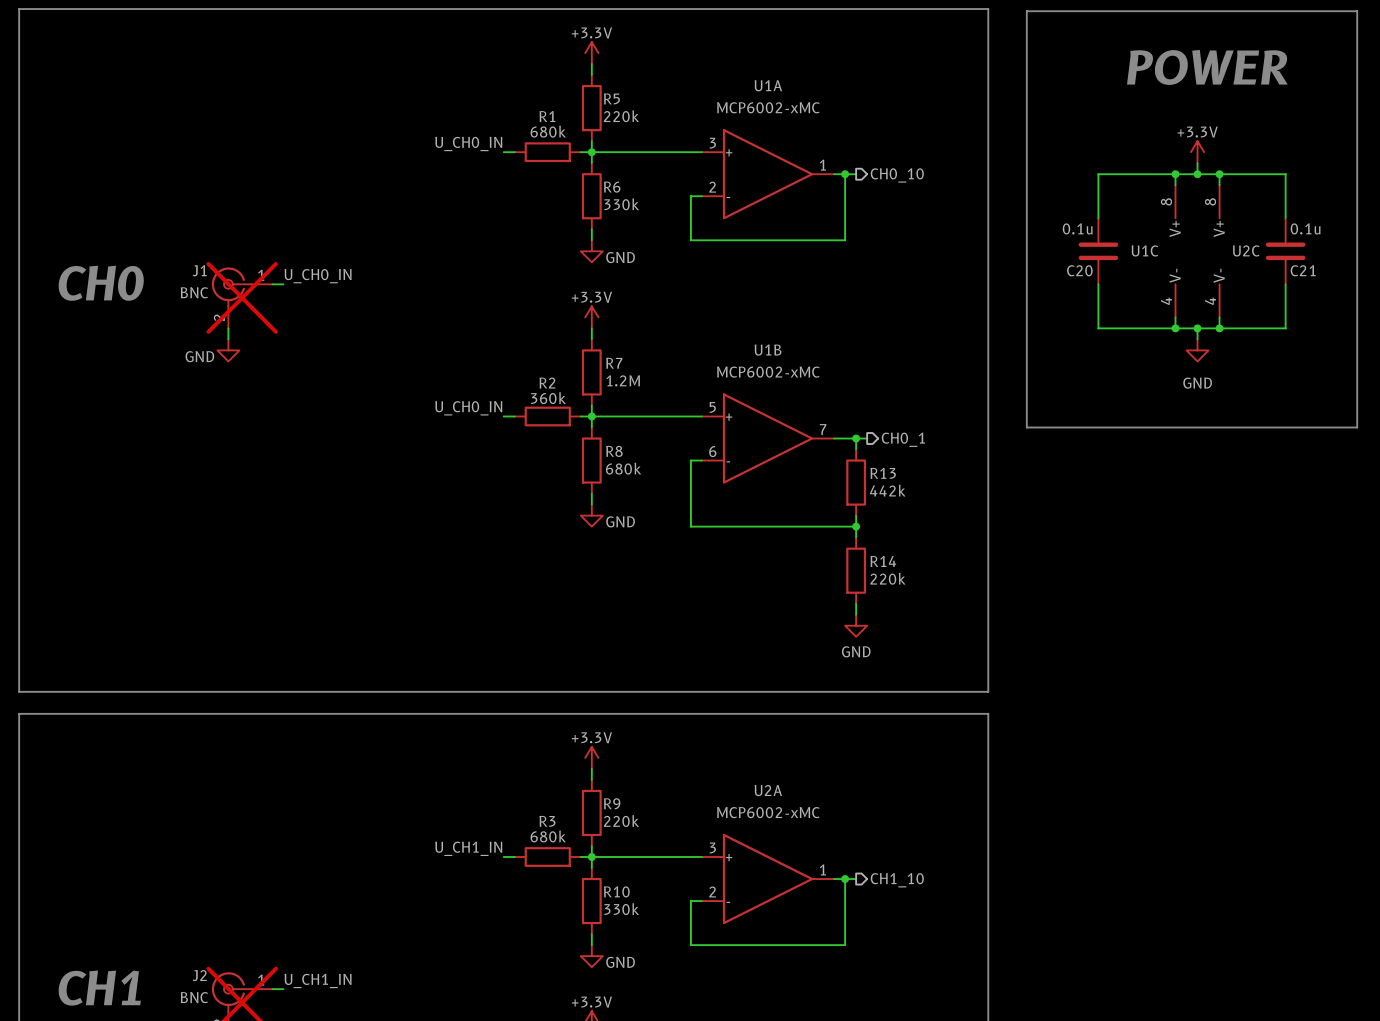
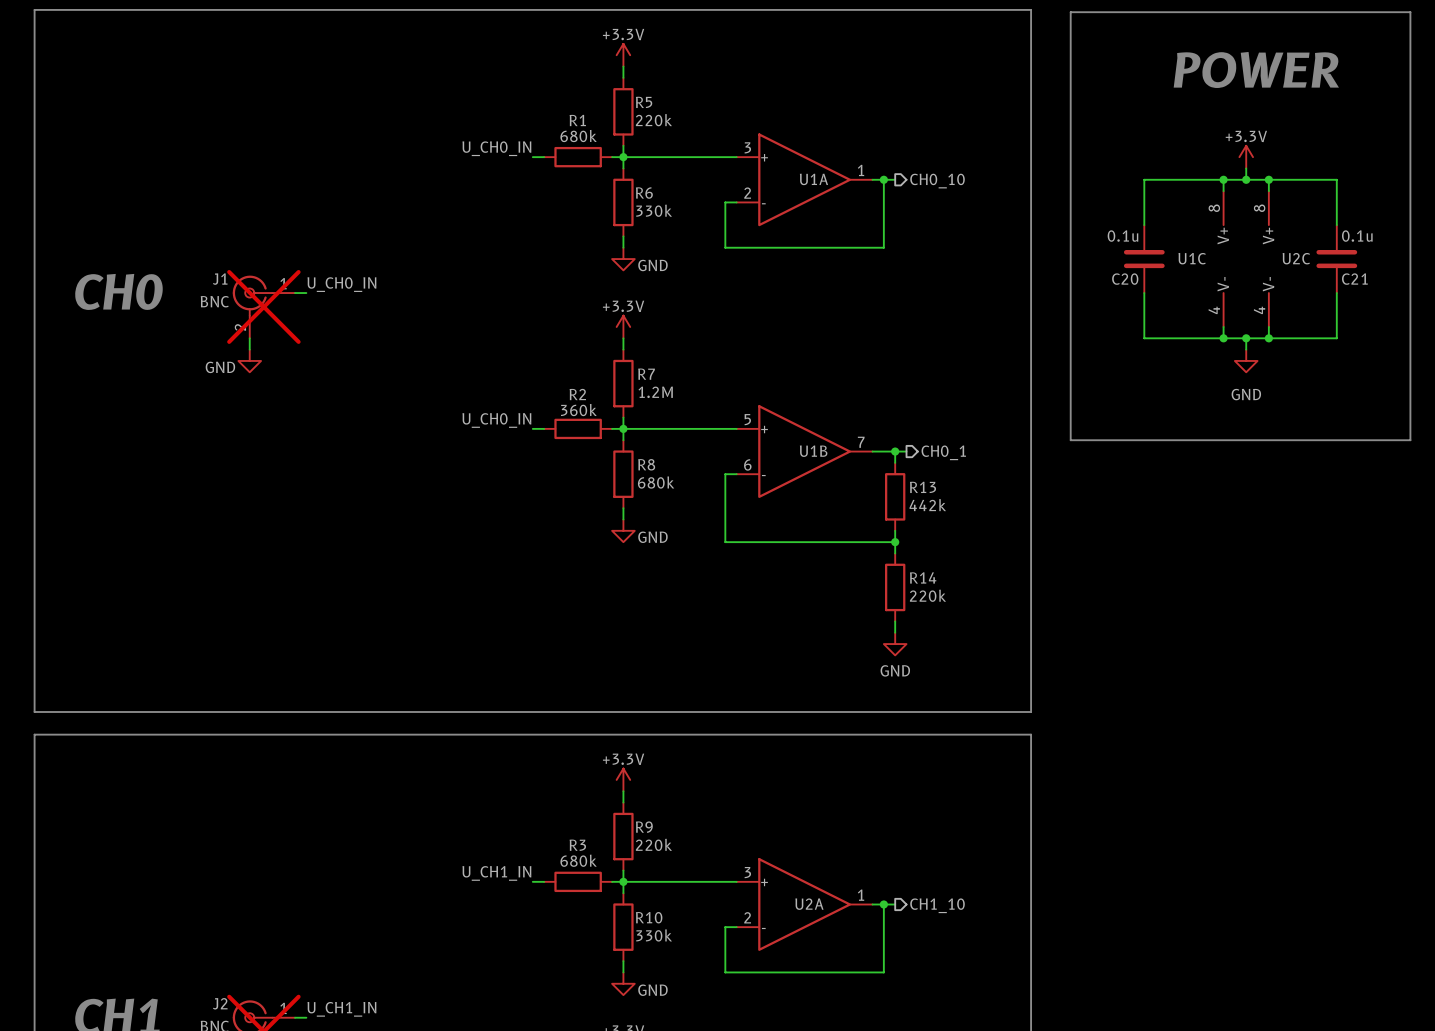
U1A name position: U1A (768, 85) -> U1A (813, 179)
U1A value: MCP6002-xMC (768, 107) -> none
U1B name position: U1B (768, 350) -> U1B (813, 451)
U1B value: MCP6002-xMC (768, 372) -> none
U2A name position: U2A (768, 790) -> U2A (809, 904)
U2A value: MCP6002-xMC (768, 812) -> none

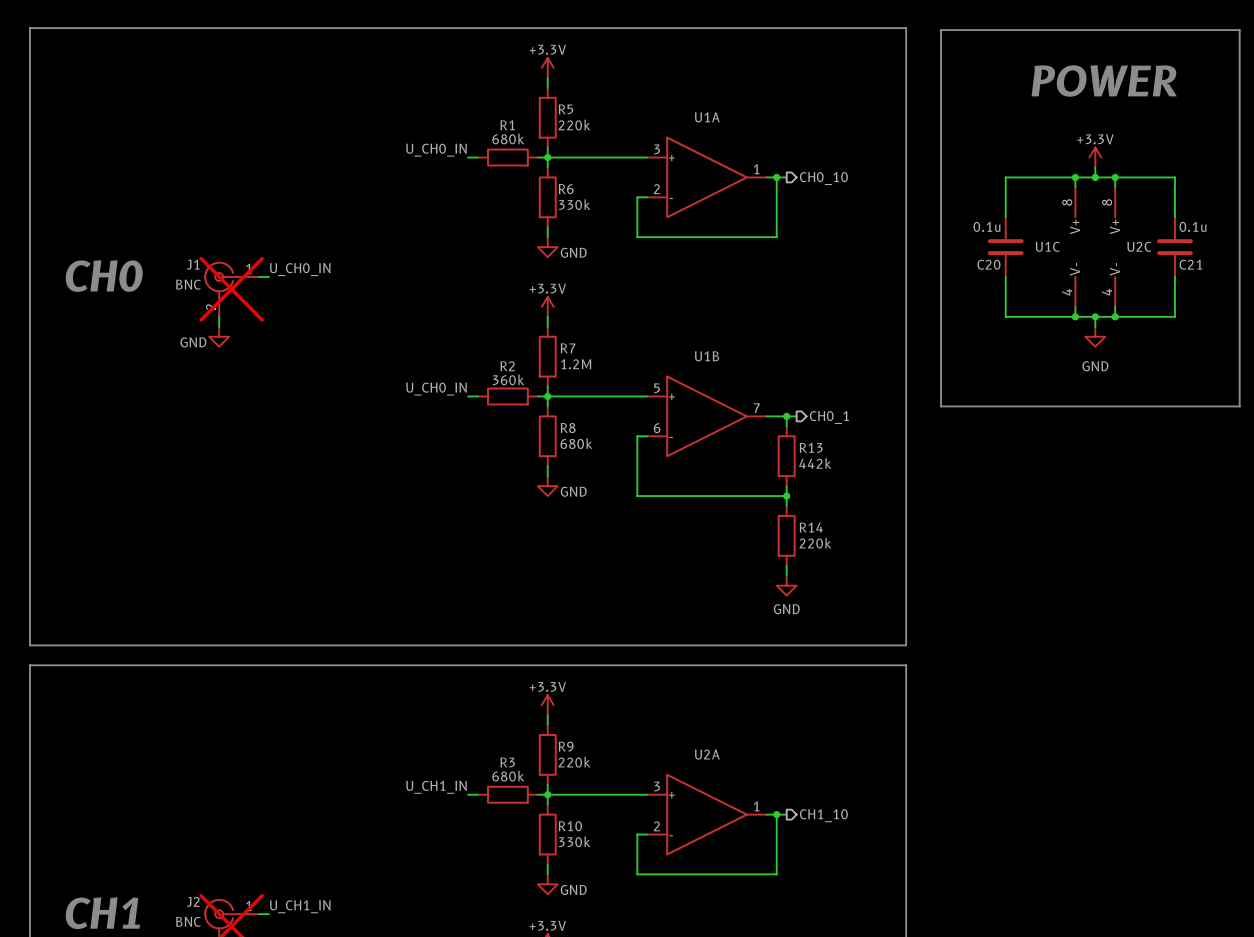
U1A name position: U1A (813, 179) -> U1A (707, 117)
U1B name position: U1B (813, 451) -> U1B (707, 356)
U2A name position: U2A (809, 904) -> U2A (707, 754)

